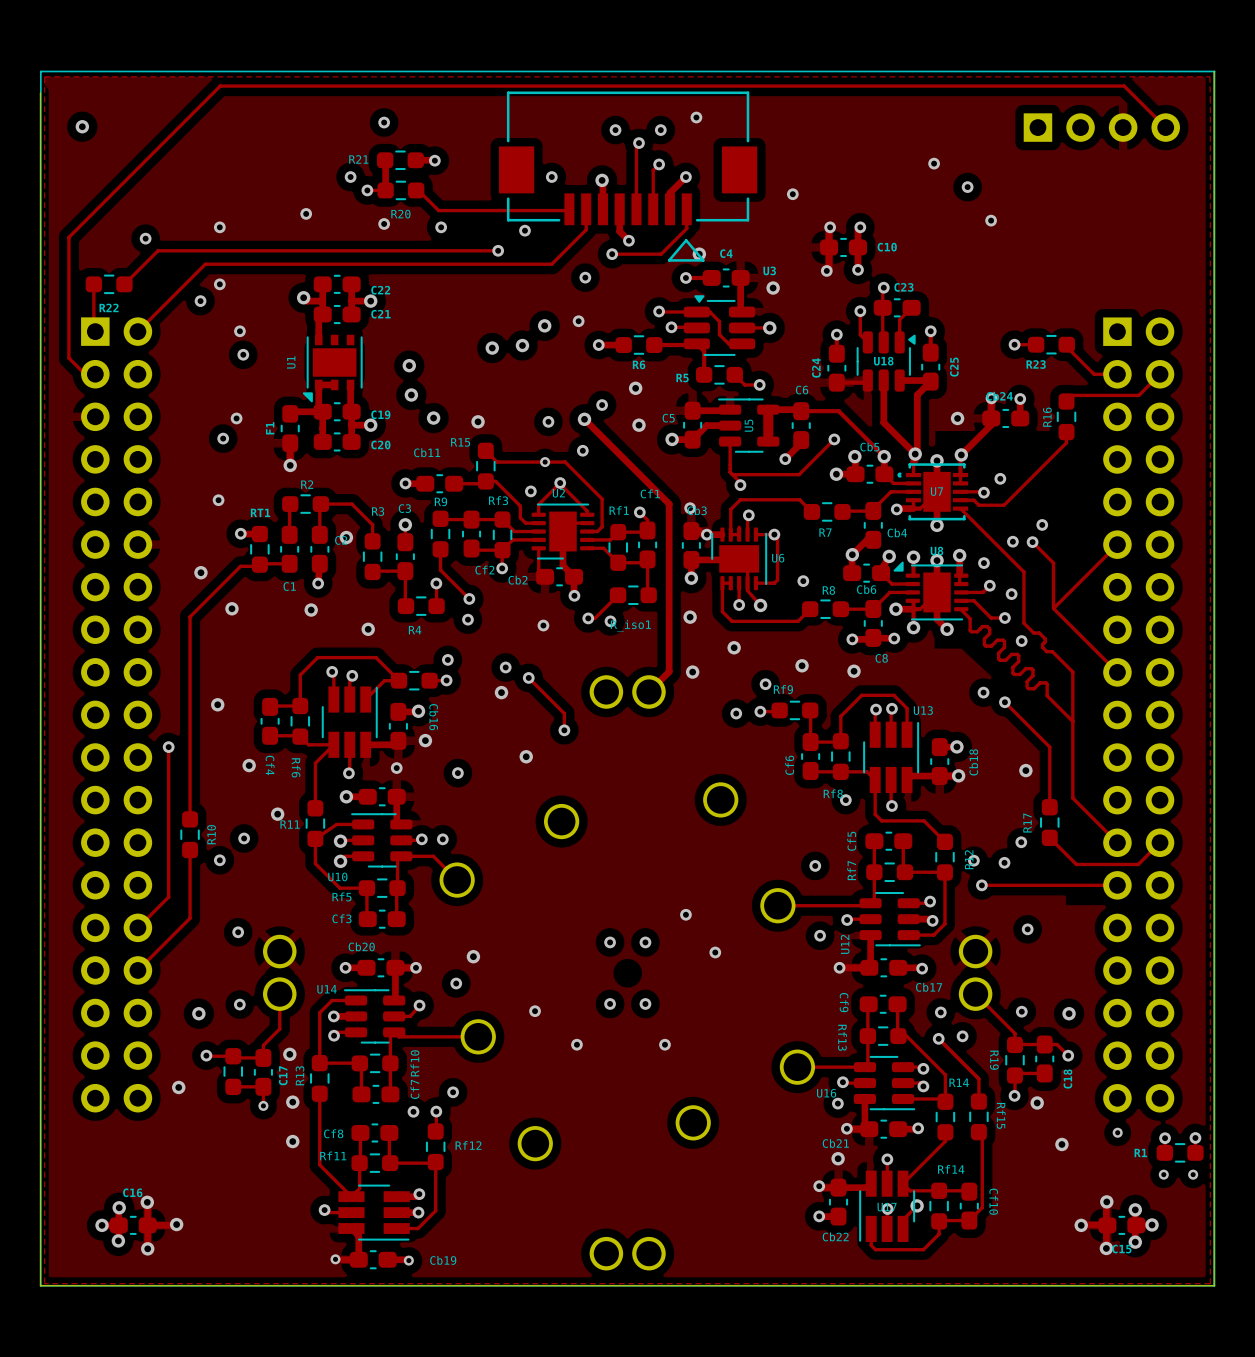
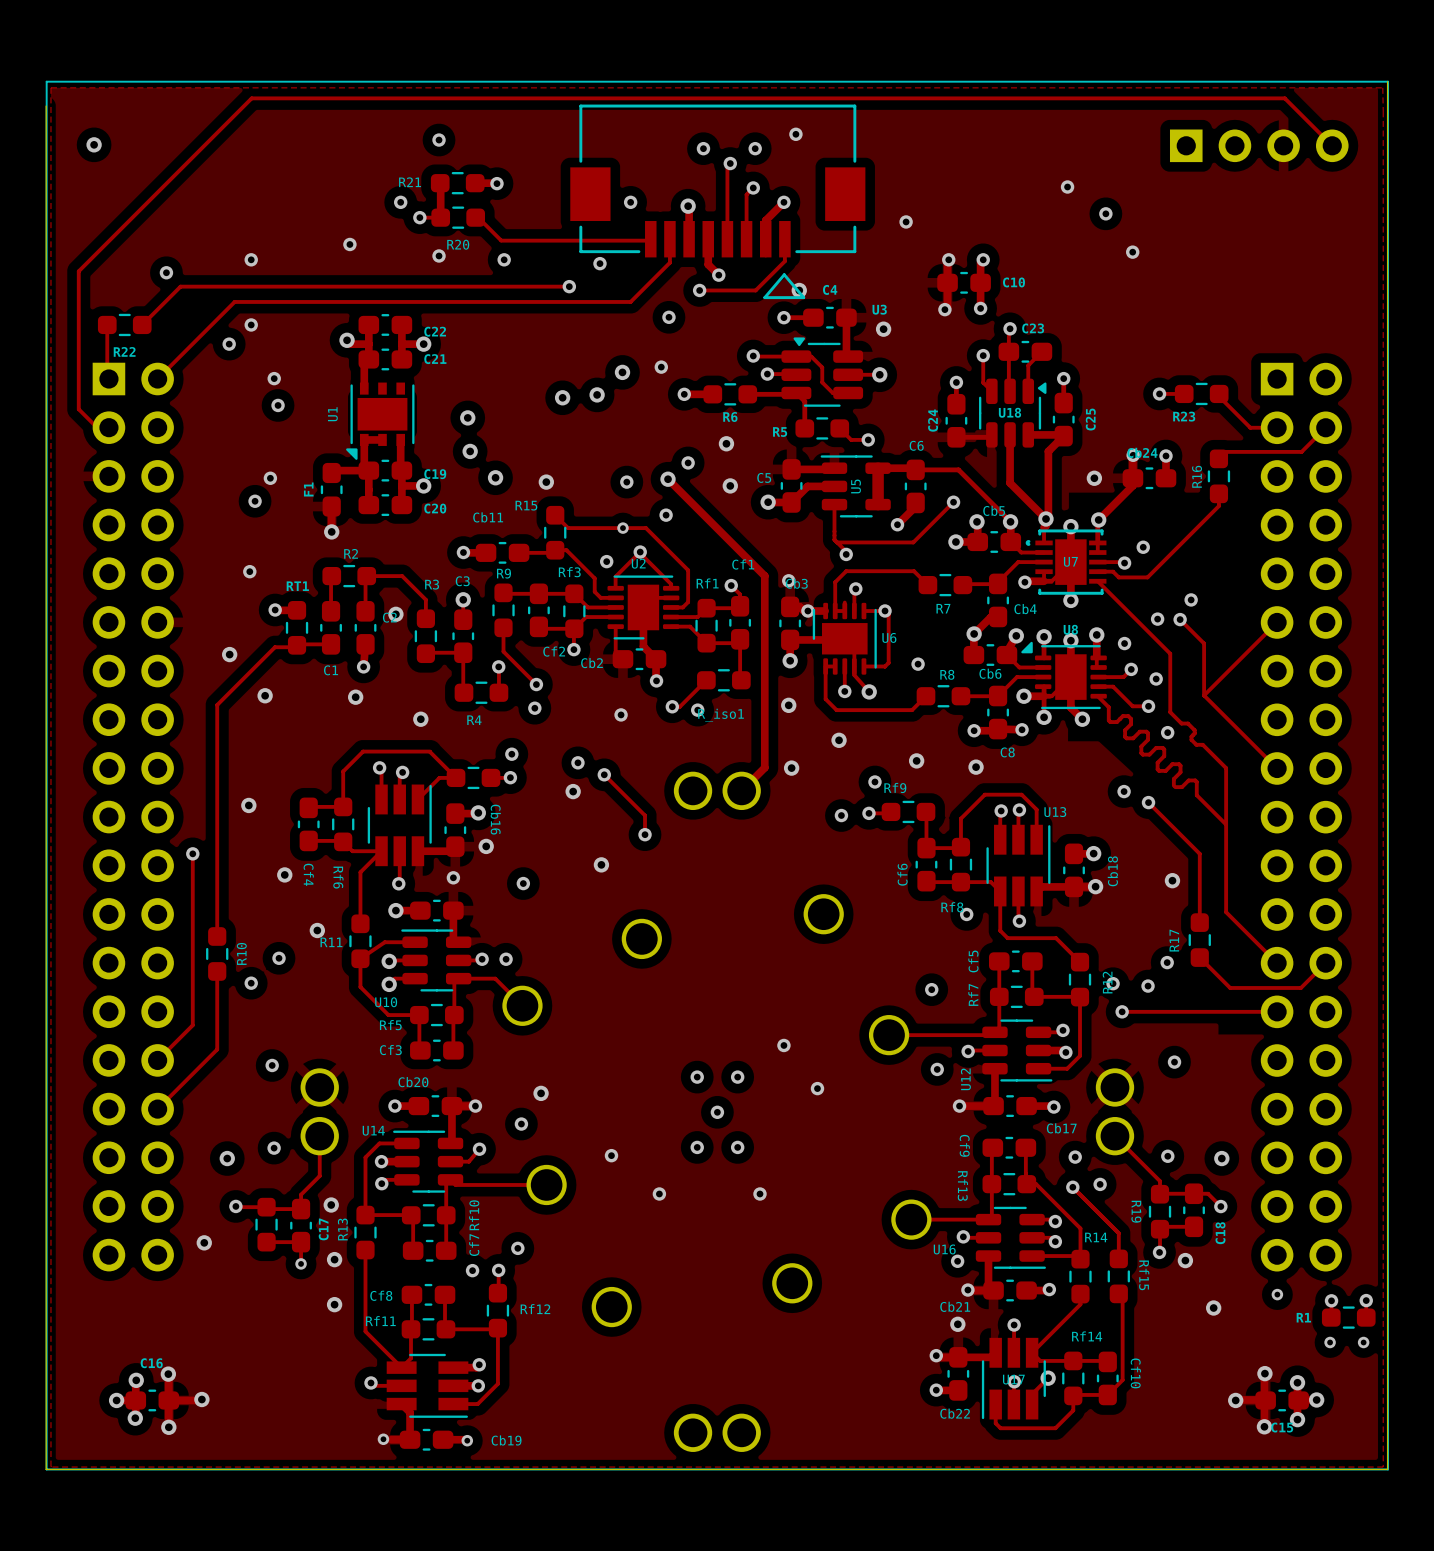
via: none -> (717, 1112)

